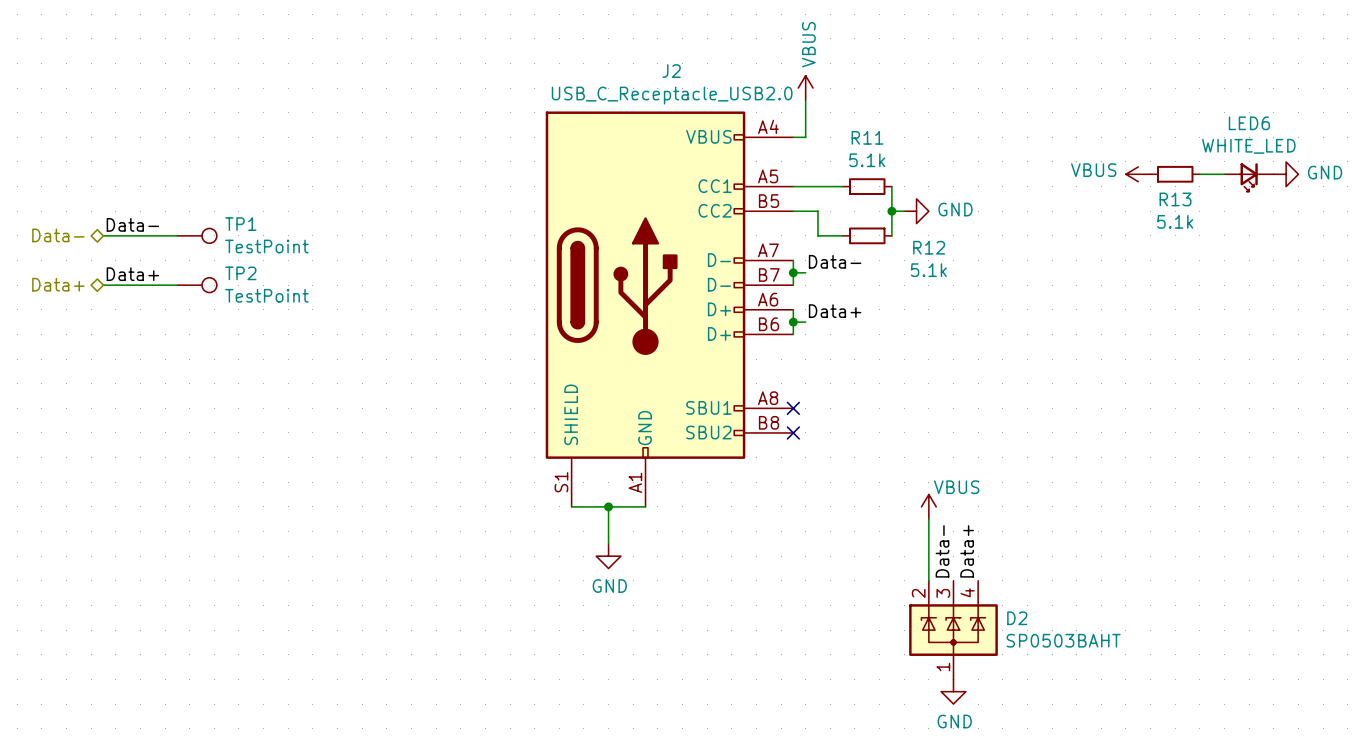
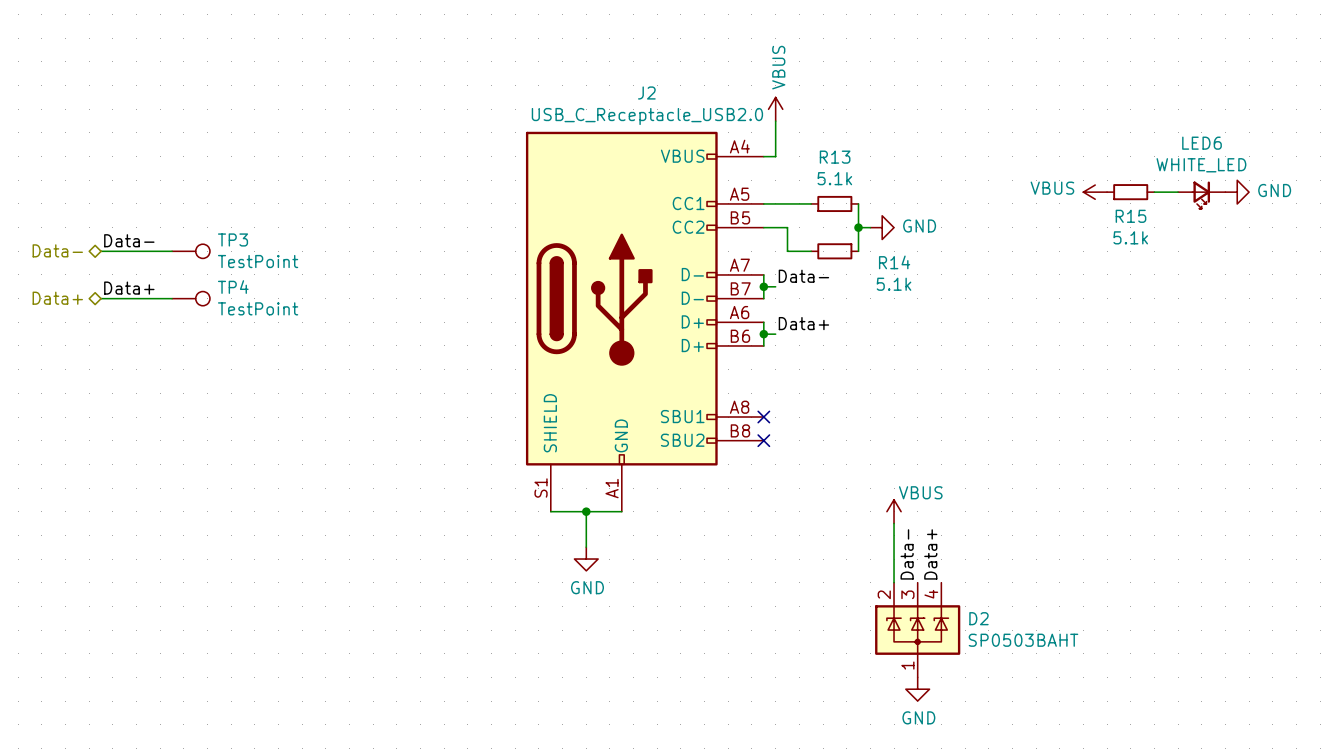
R11 name: R11 (867, 137) -> R13 (835, 157)
R13 name: R13 (1175, 199) -> R15 (1130, 216)
TP1 name: TP1 (240, 224) -> TP3 (233, 239)
R12 name: R12 (929, 247) -> R14 (894, 262)
TP2 name: TP2 (240, 273) -> TP4 (233, 287)

